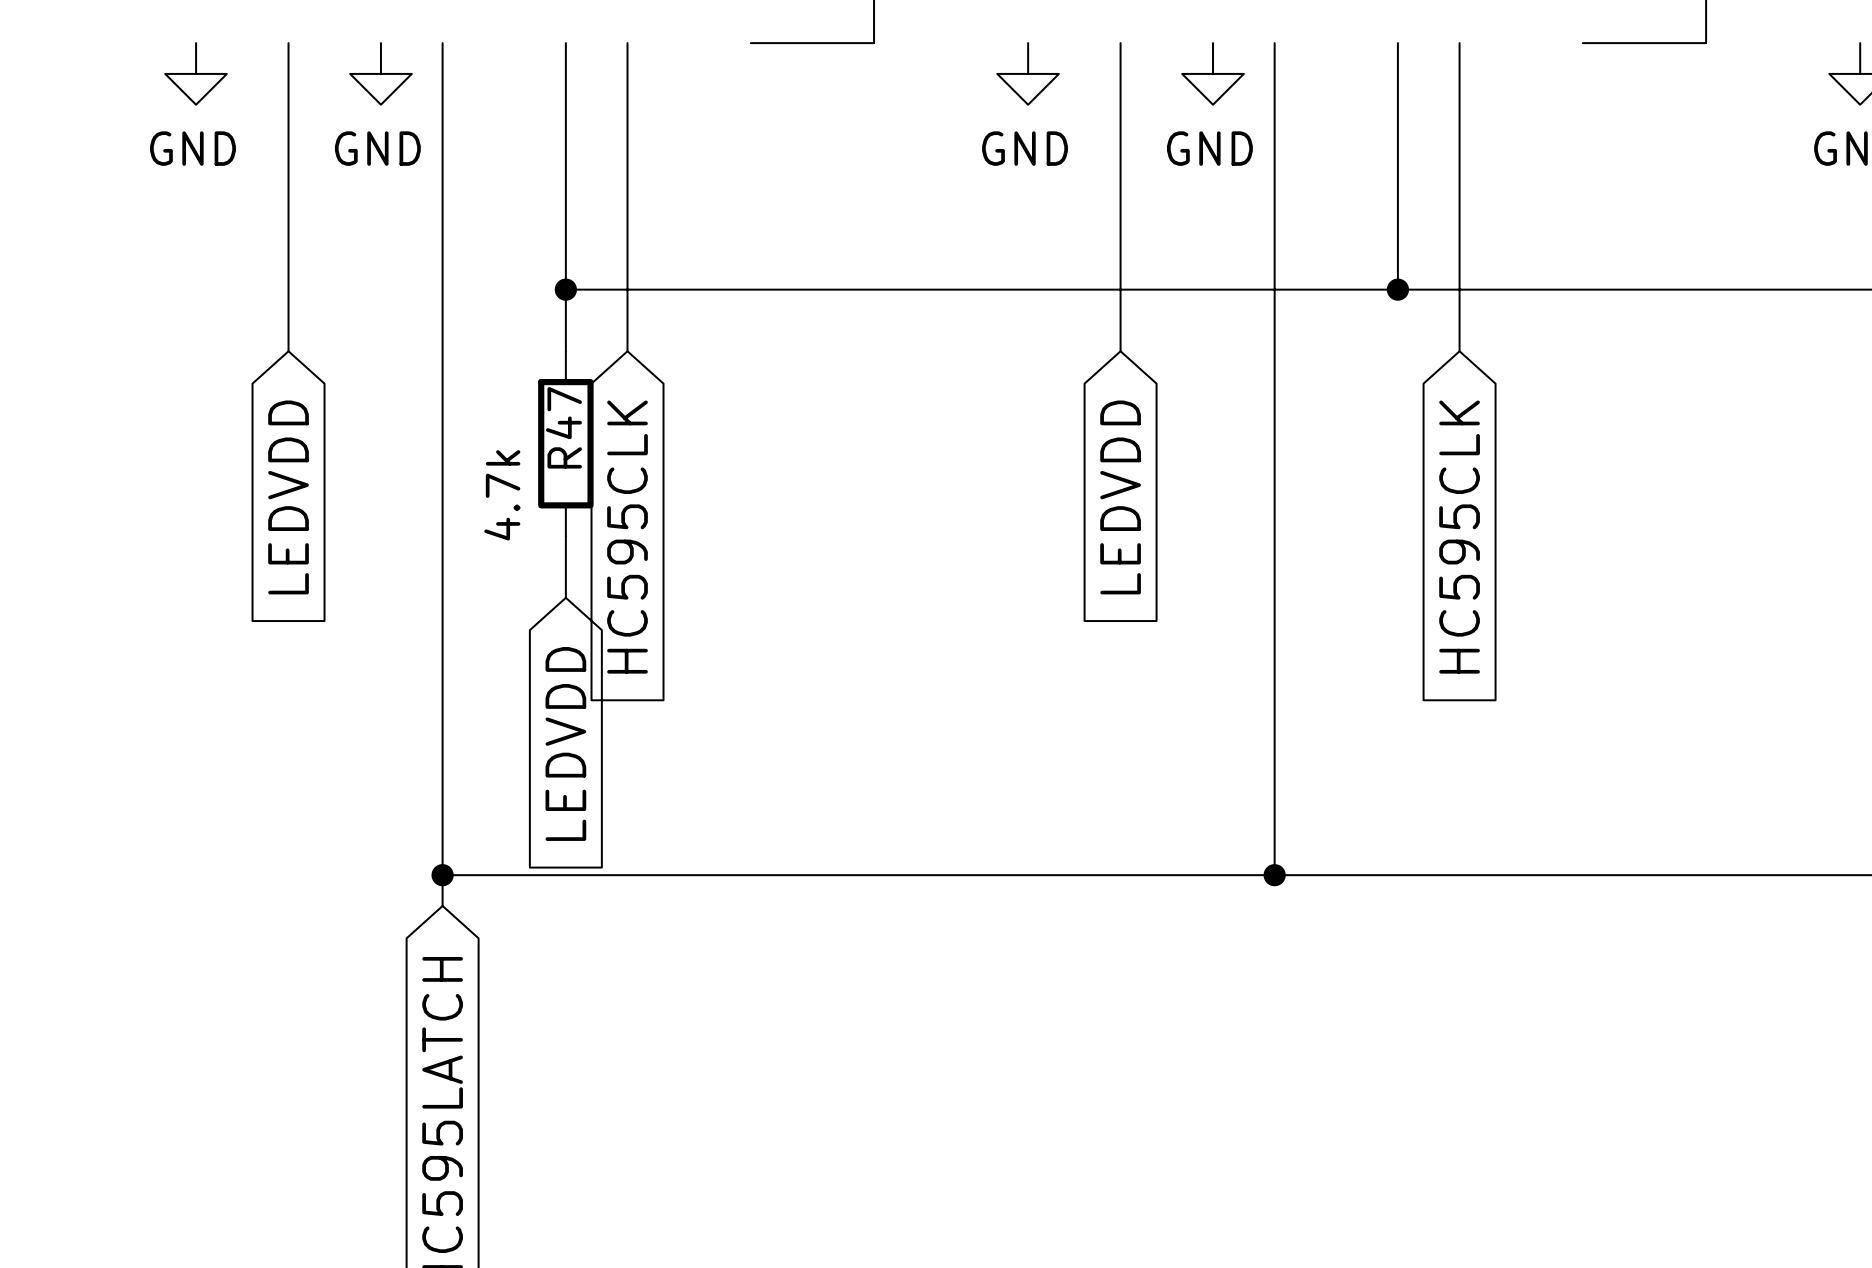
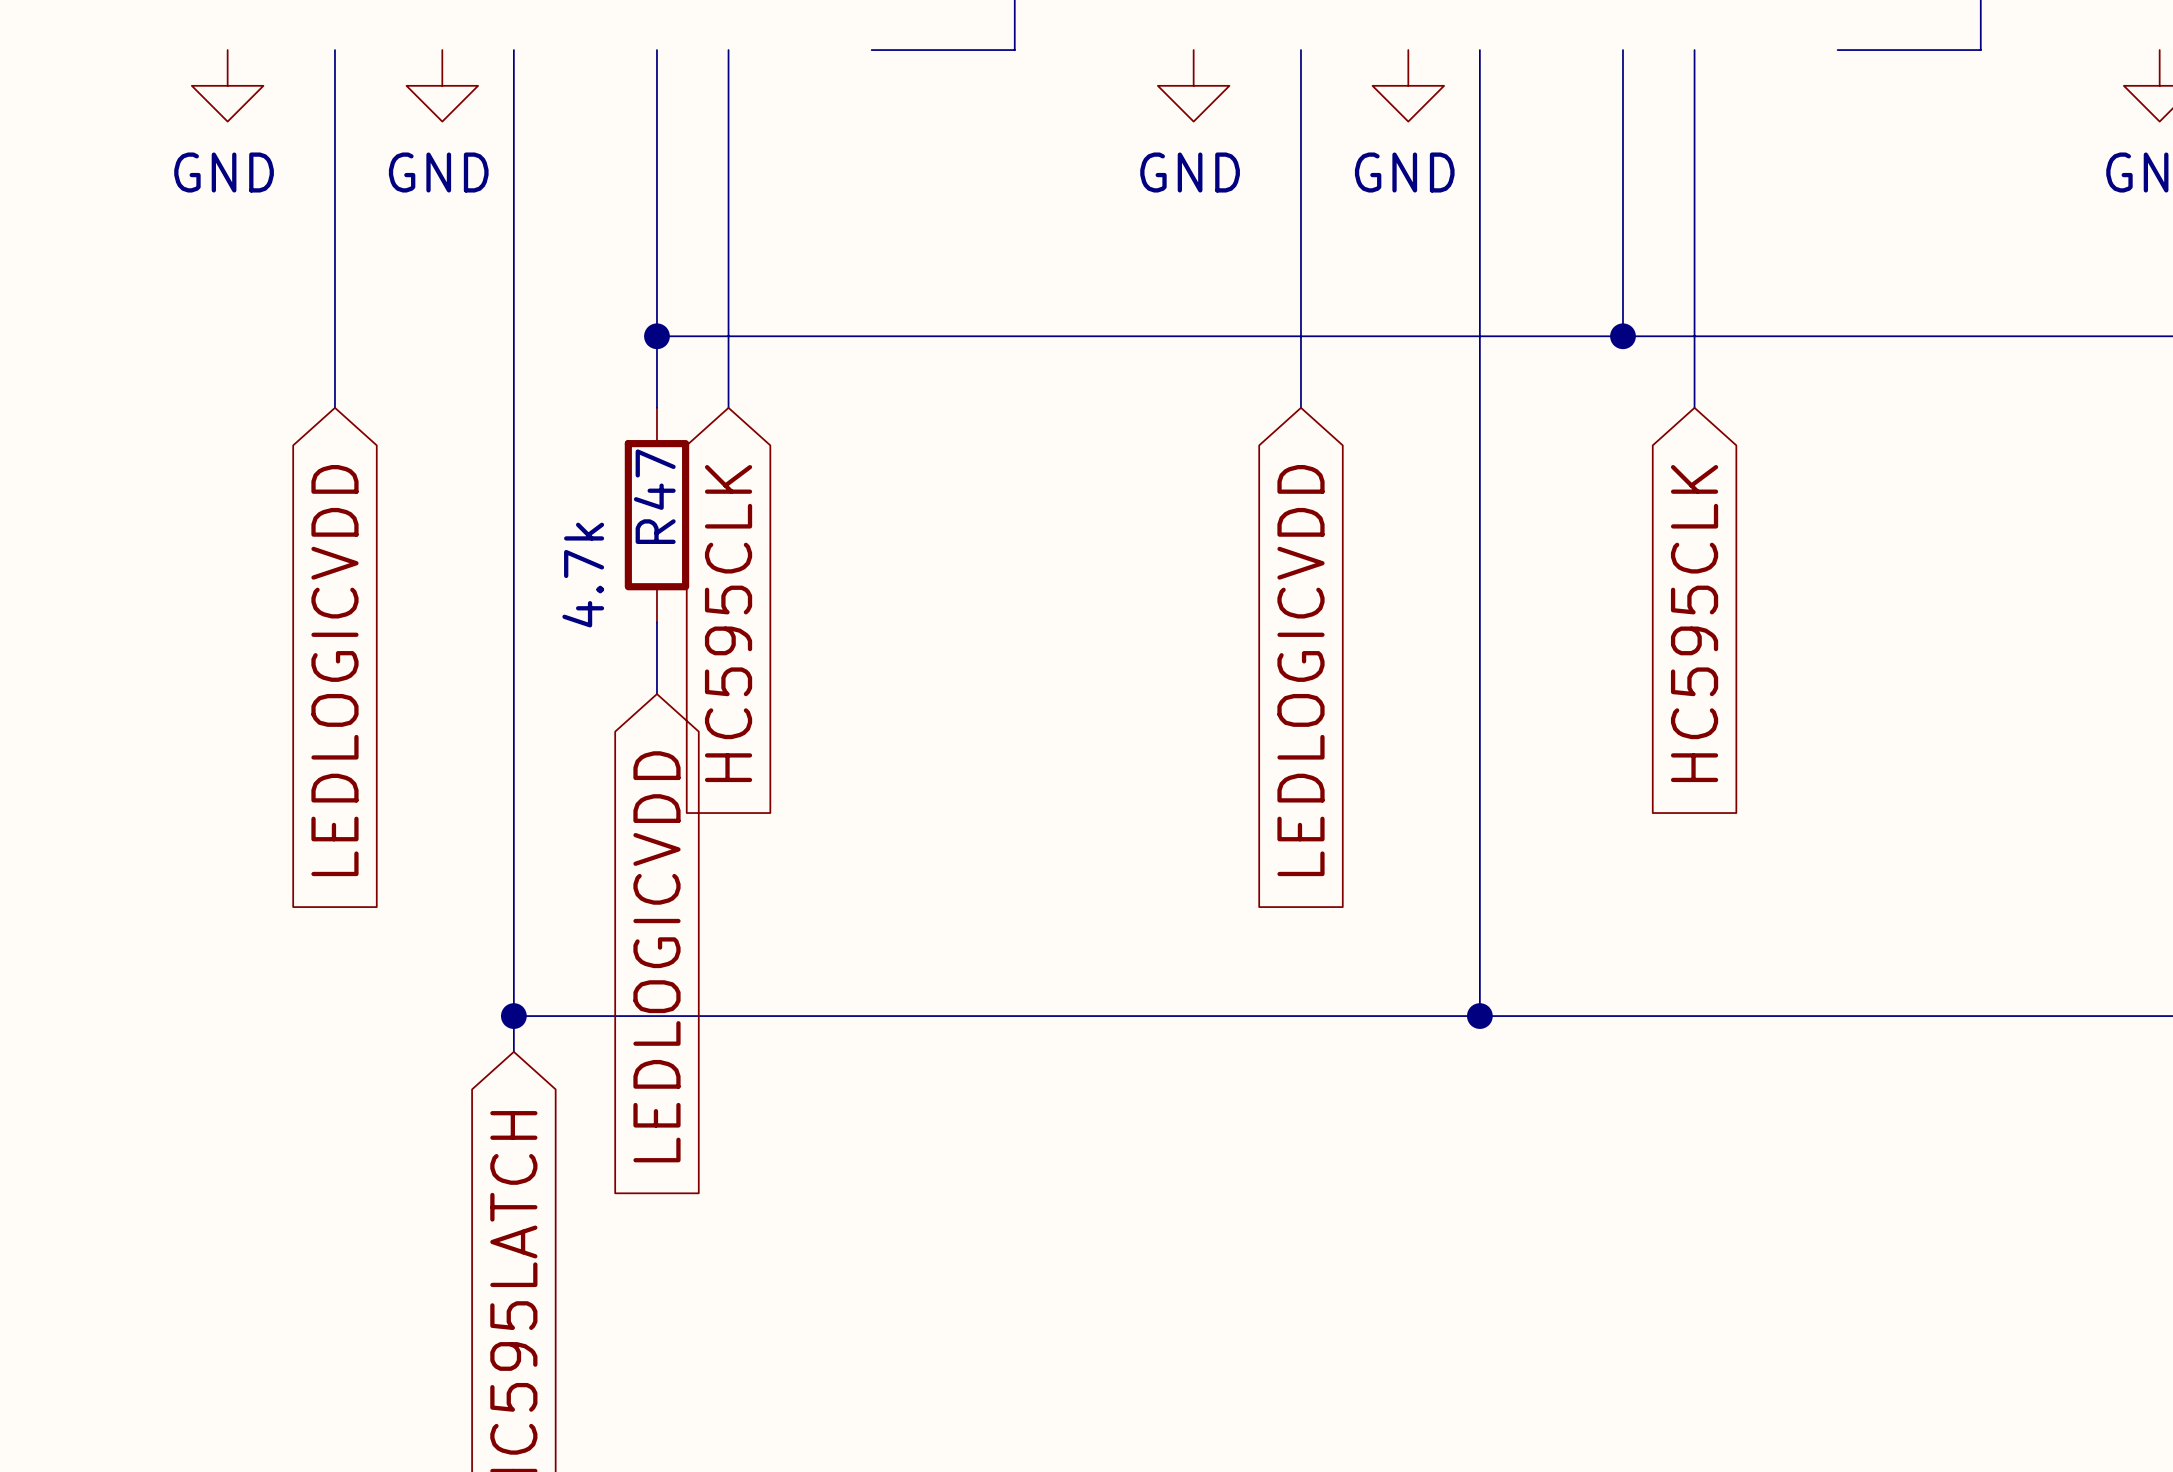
global label: LEDVDD (288, 497) -> LEDLOGICVDD (334, 670)
global label: LEDVDD (1120, 497) -> LEDLOGICVDD (1300, 670)
global label: LEDVDD (565, 743) -> LEDLOGICVDD (656, 956)

